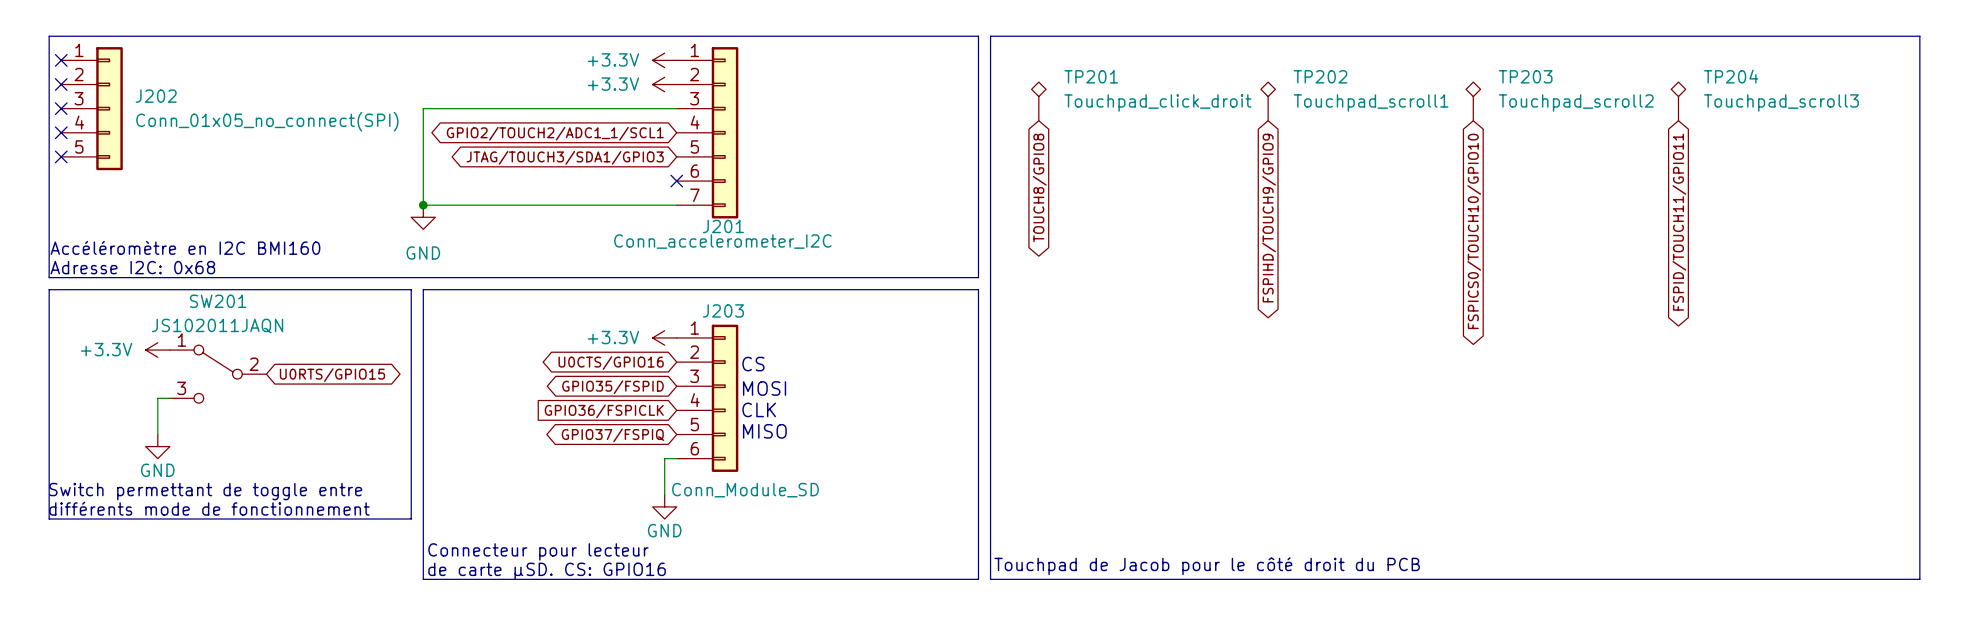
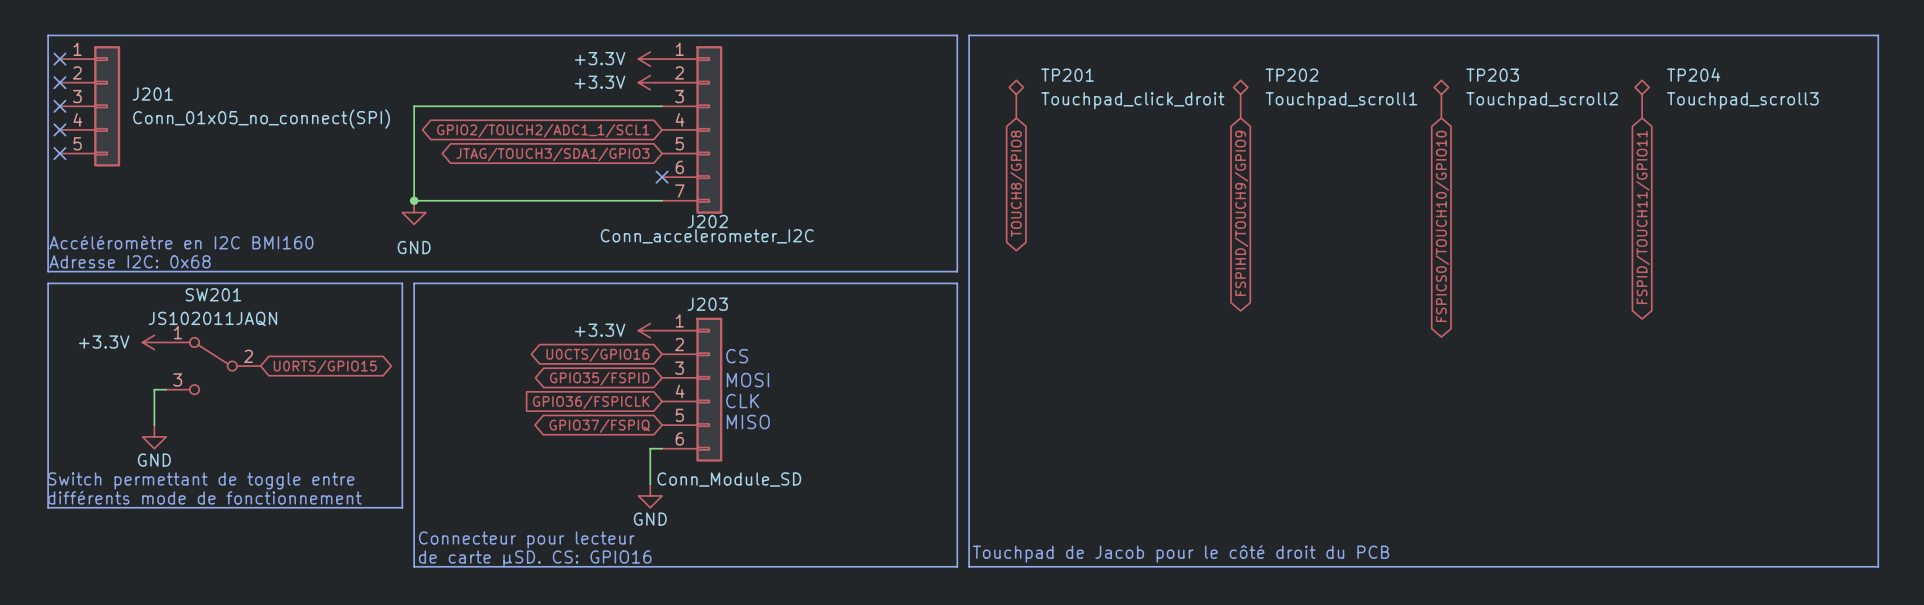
J202 name: J202 (156, 96) -> J201 (152, 94)
J201 name: J201 (723, 226) -> J202 (707, 221)

